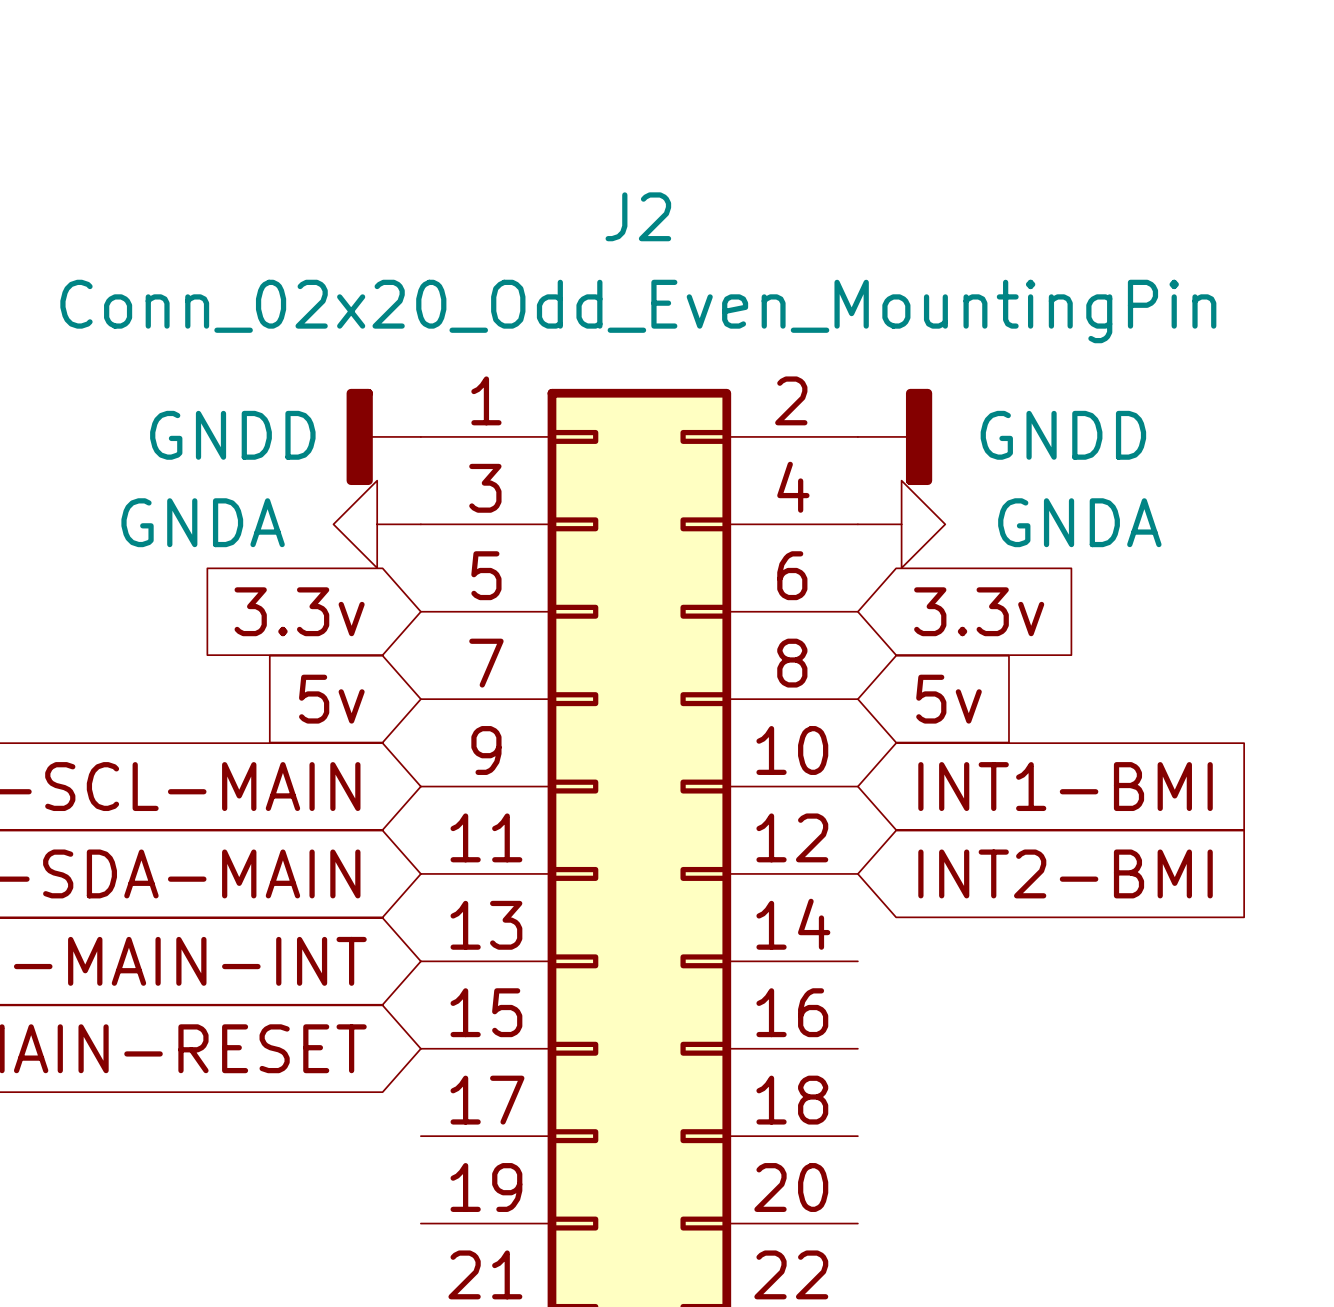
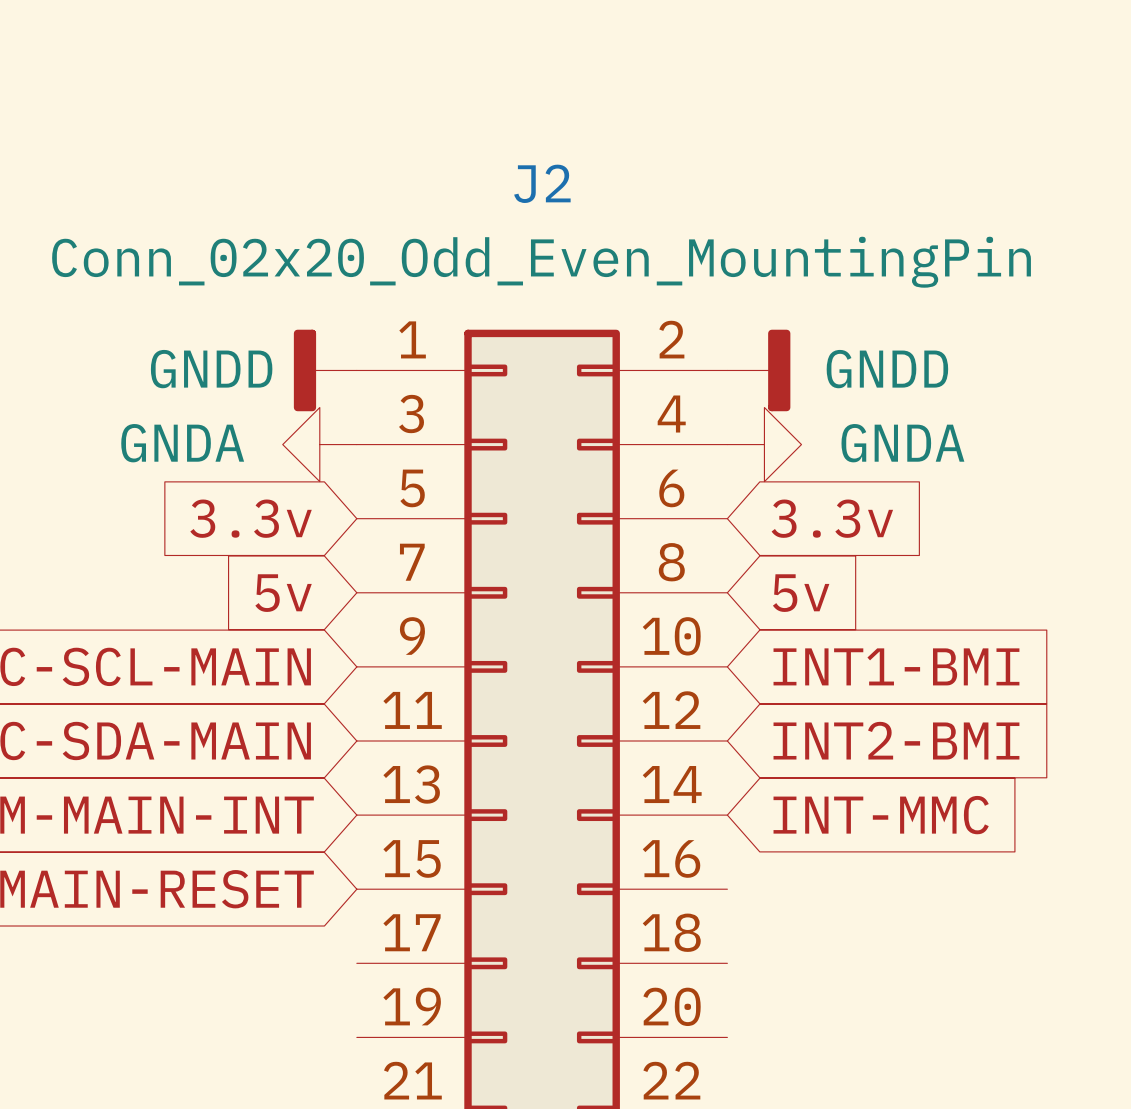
global label: none -> INT-MMC (881, 815)

